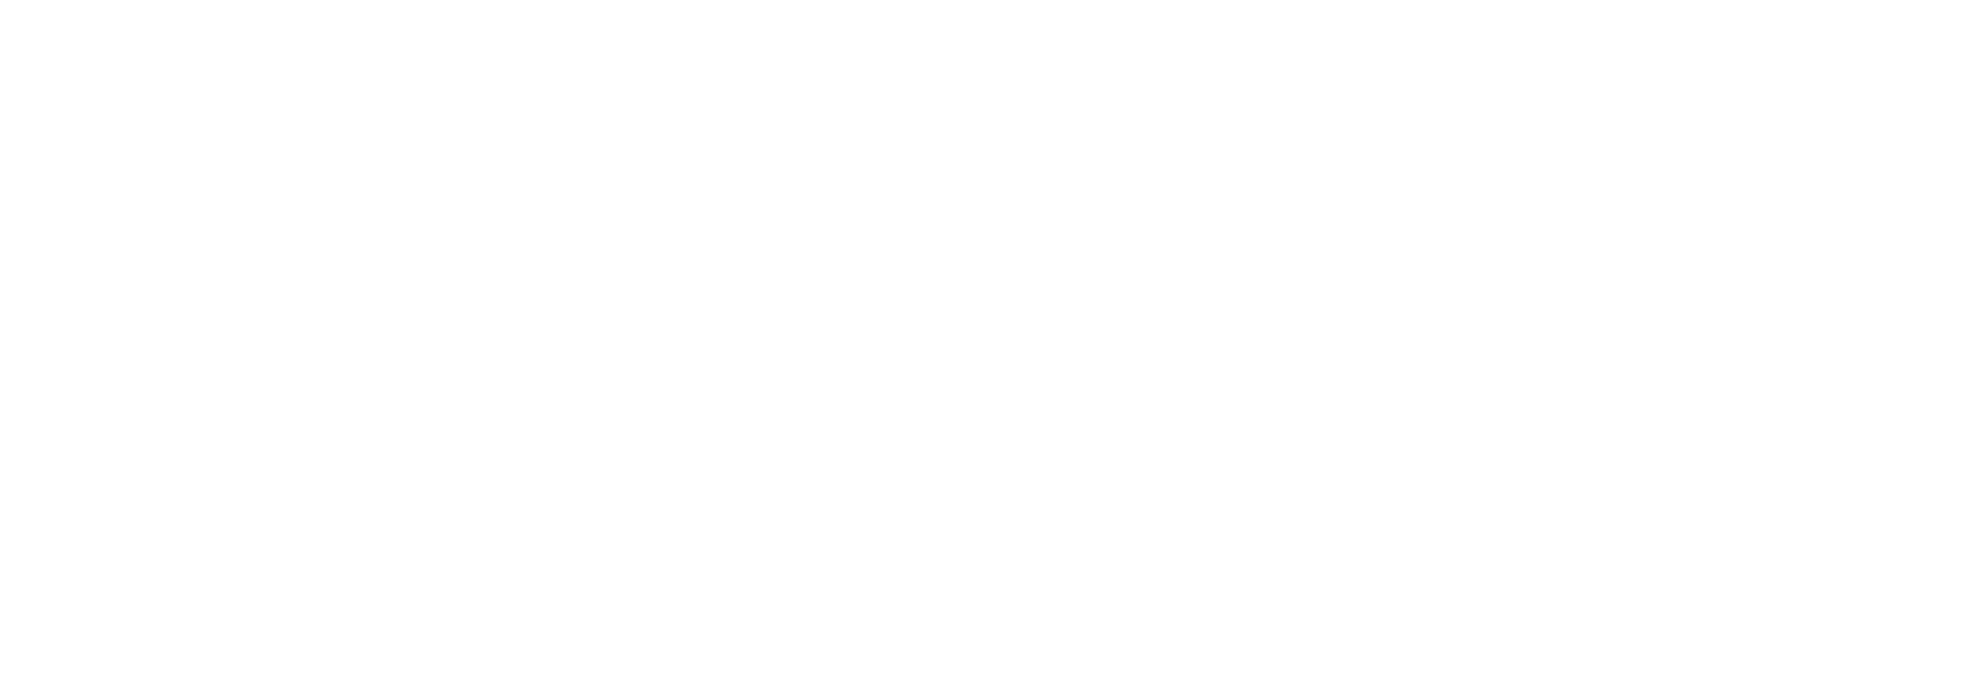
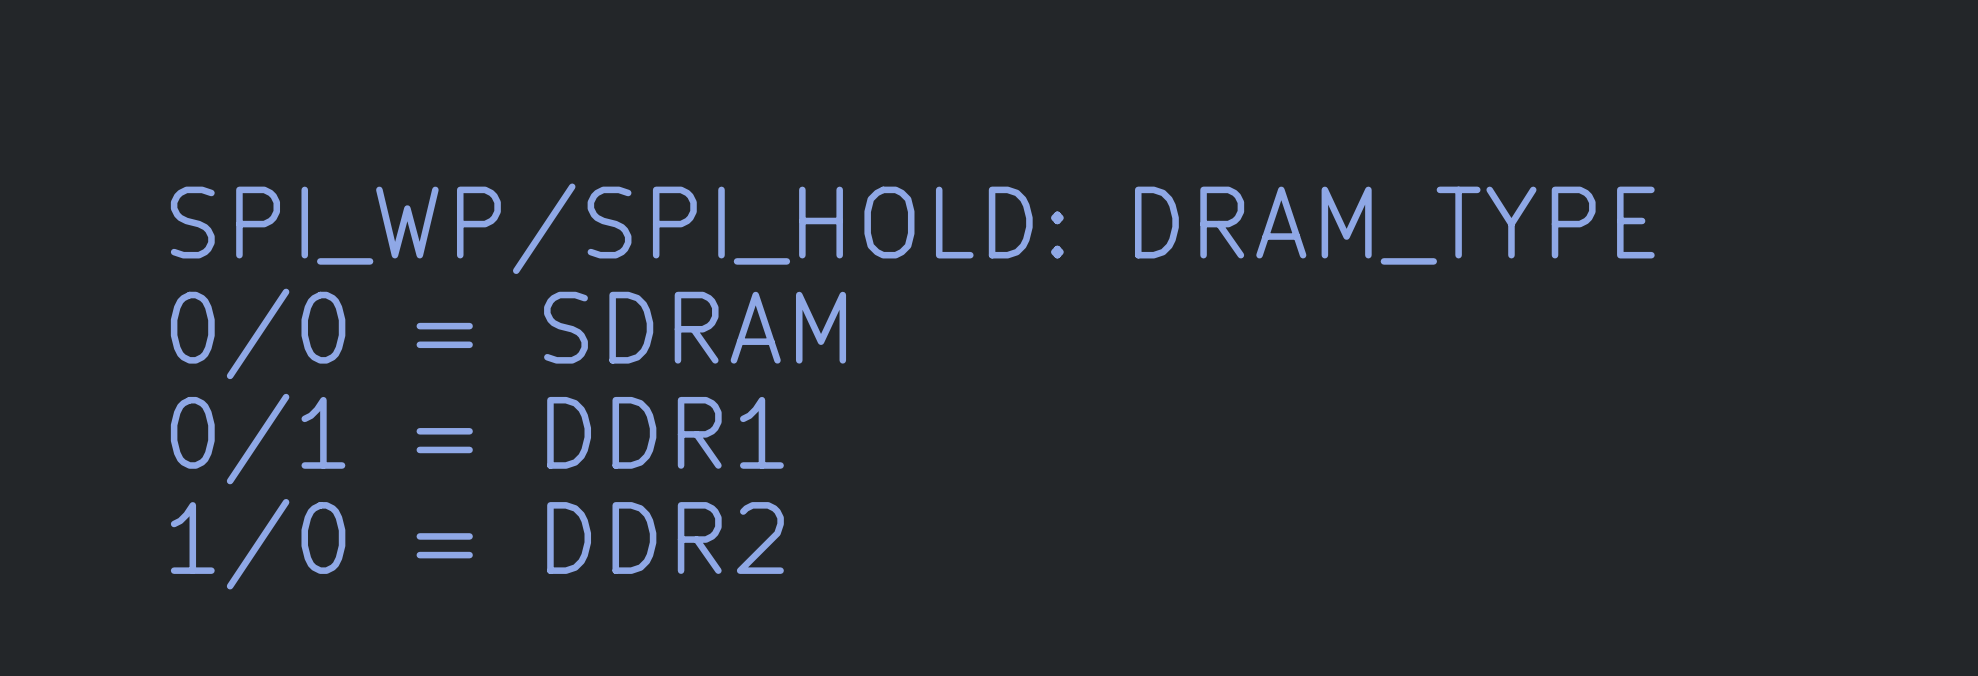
text: none -> SPI_WP/SPI_HOLD: DRAM_TYPE (912, 228)
text: none -> 0/0 = SDRAM (508, 333)
text: none -> 0/1 = DDR1 (477, 439)
text: none -> 1/0 = DDR2 (477, 544)

